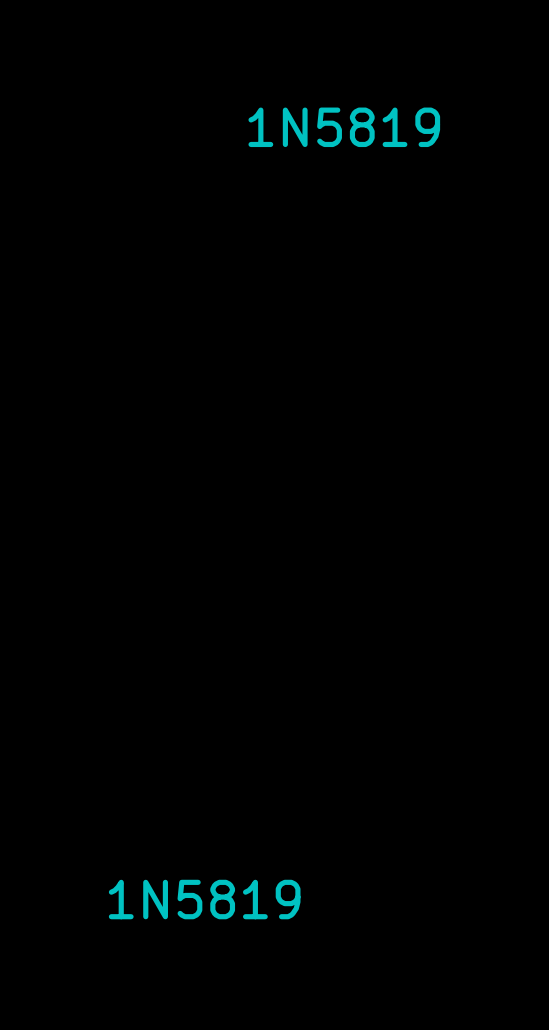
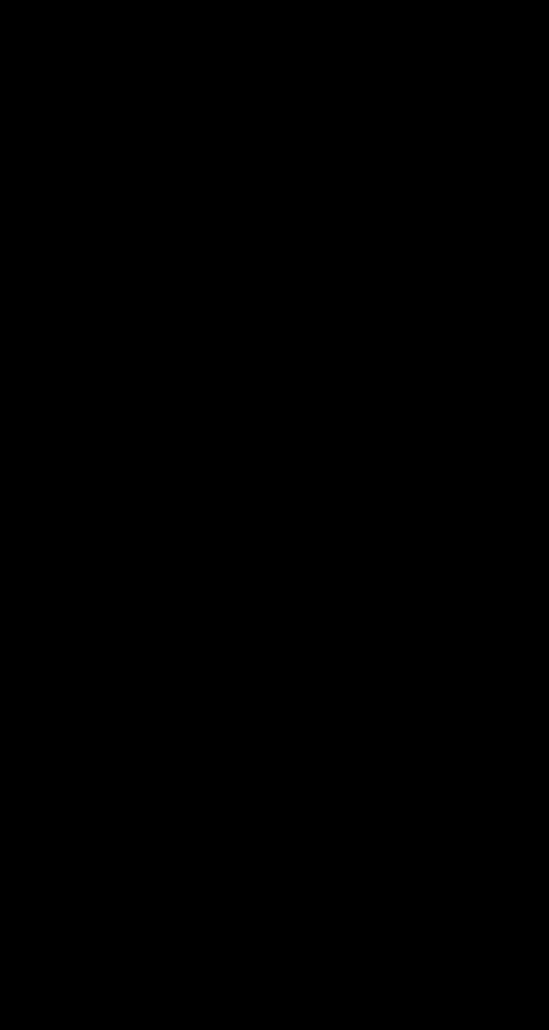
drawing: [248, 107, 441, 148] -> none
drawing: [108, 879, 301, 920] -> none

